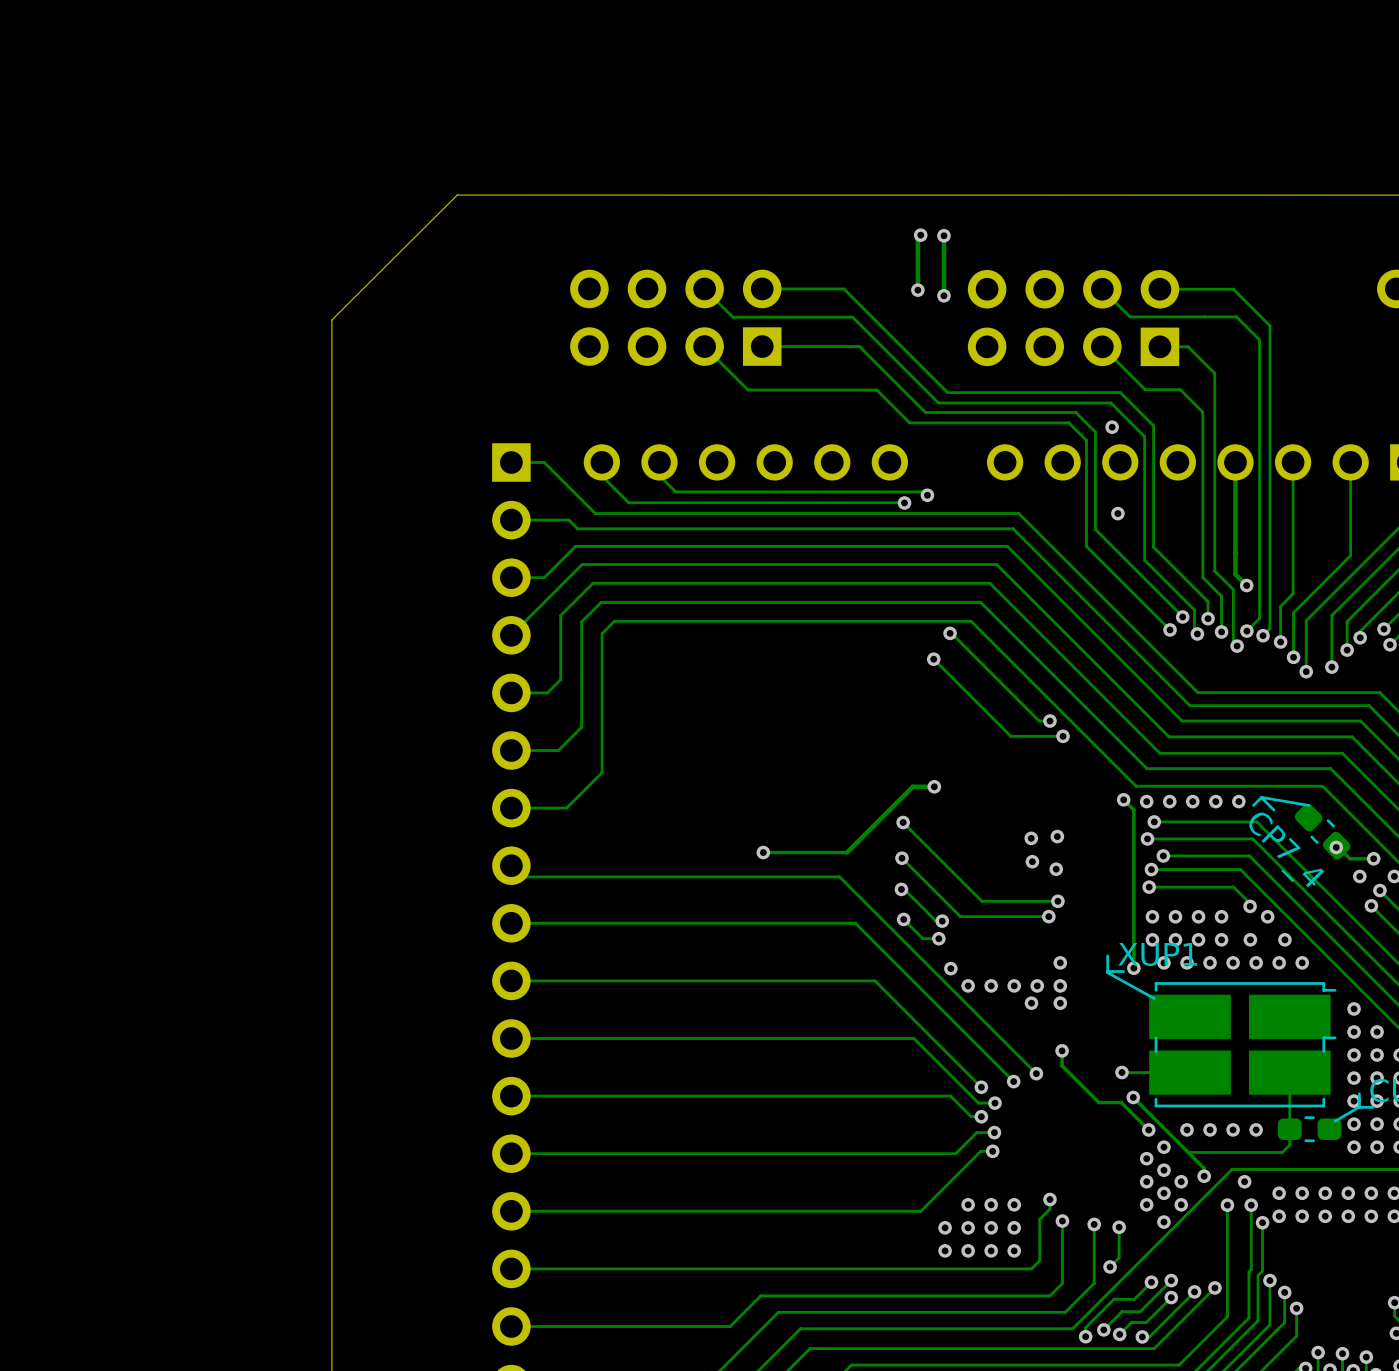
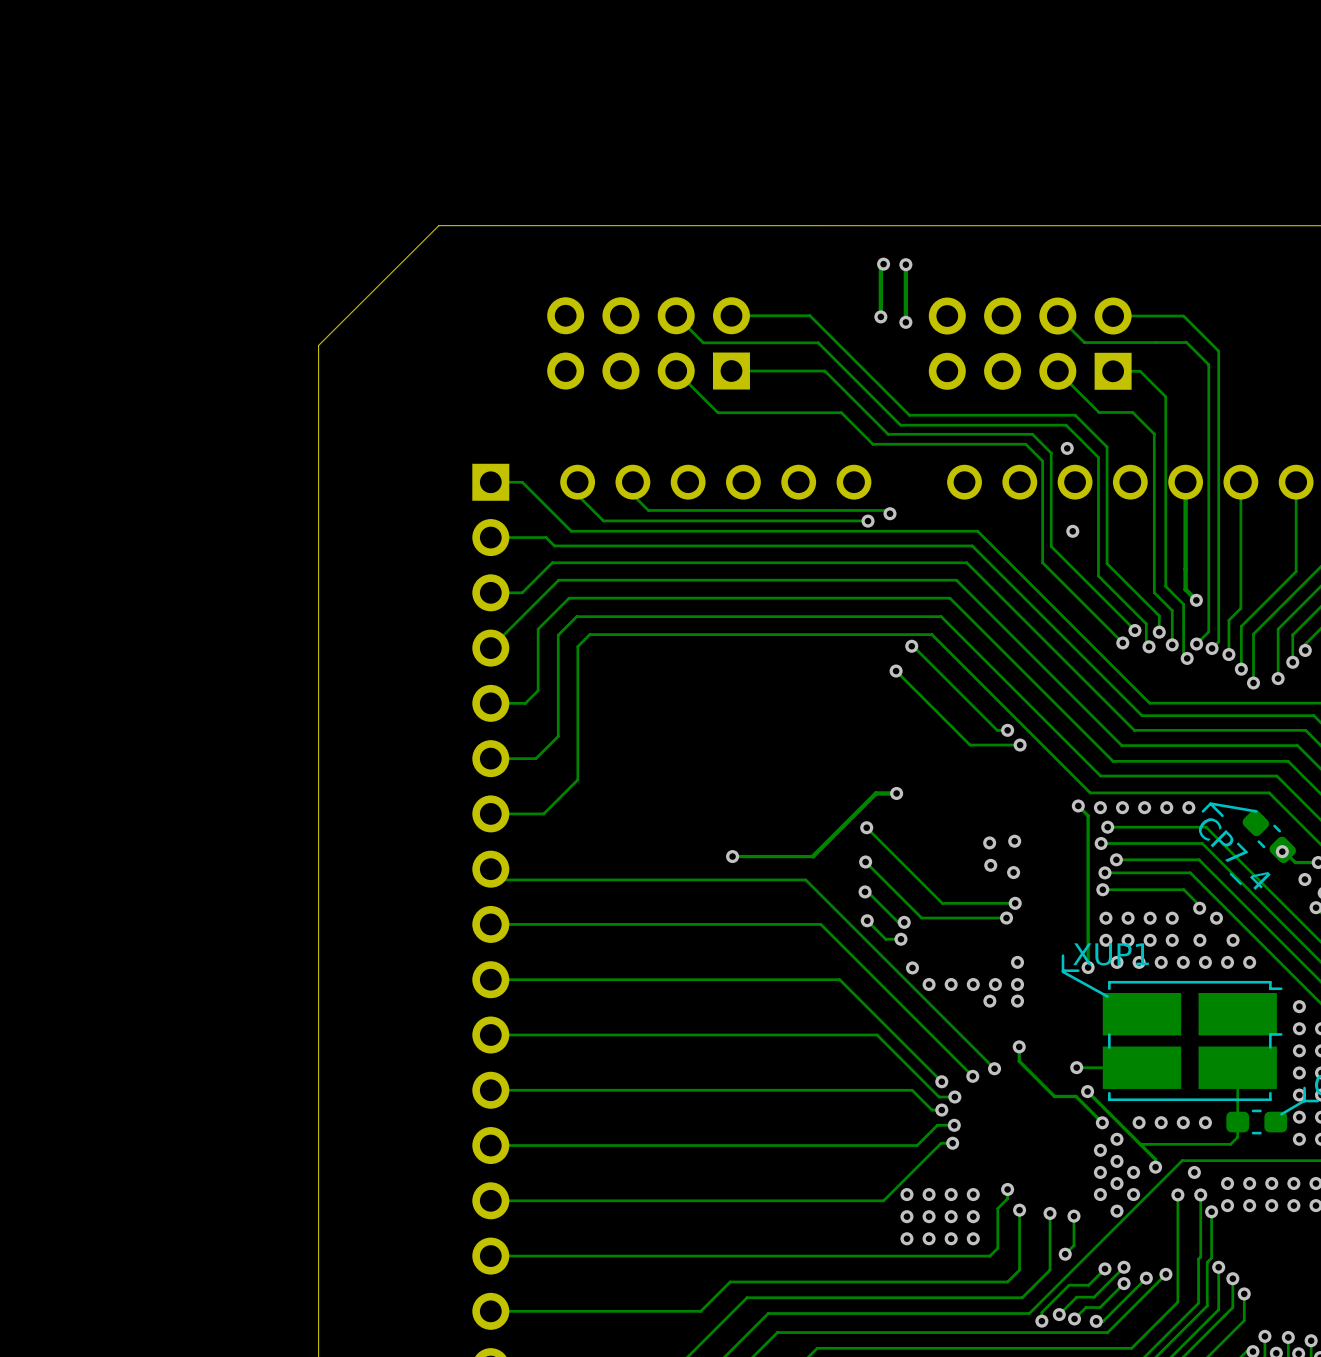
via: none -> (906, 1194)

